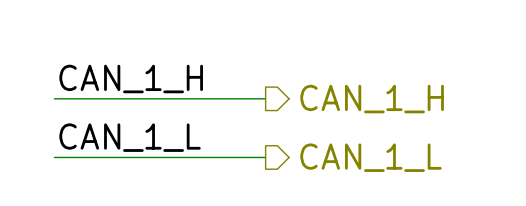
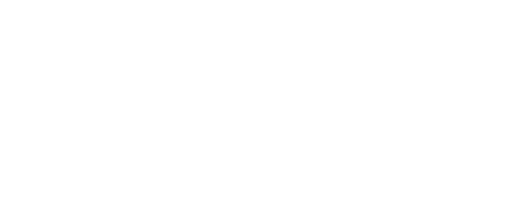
label: CAN_1_H (131, 79) -> none
wire: (54, 98) (265, 98) -> none
hierarchical label: CAN_1_H (372, 99) -> none
label: CAN_1_L (130, 137) -> none
wire: (54, 157) (265, 157) -> none
hierarchical label: CAN_1_L (371, 157) -> none

